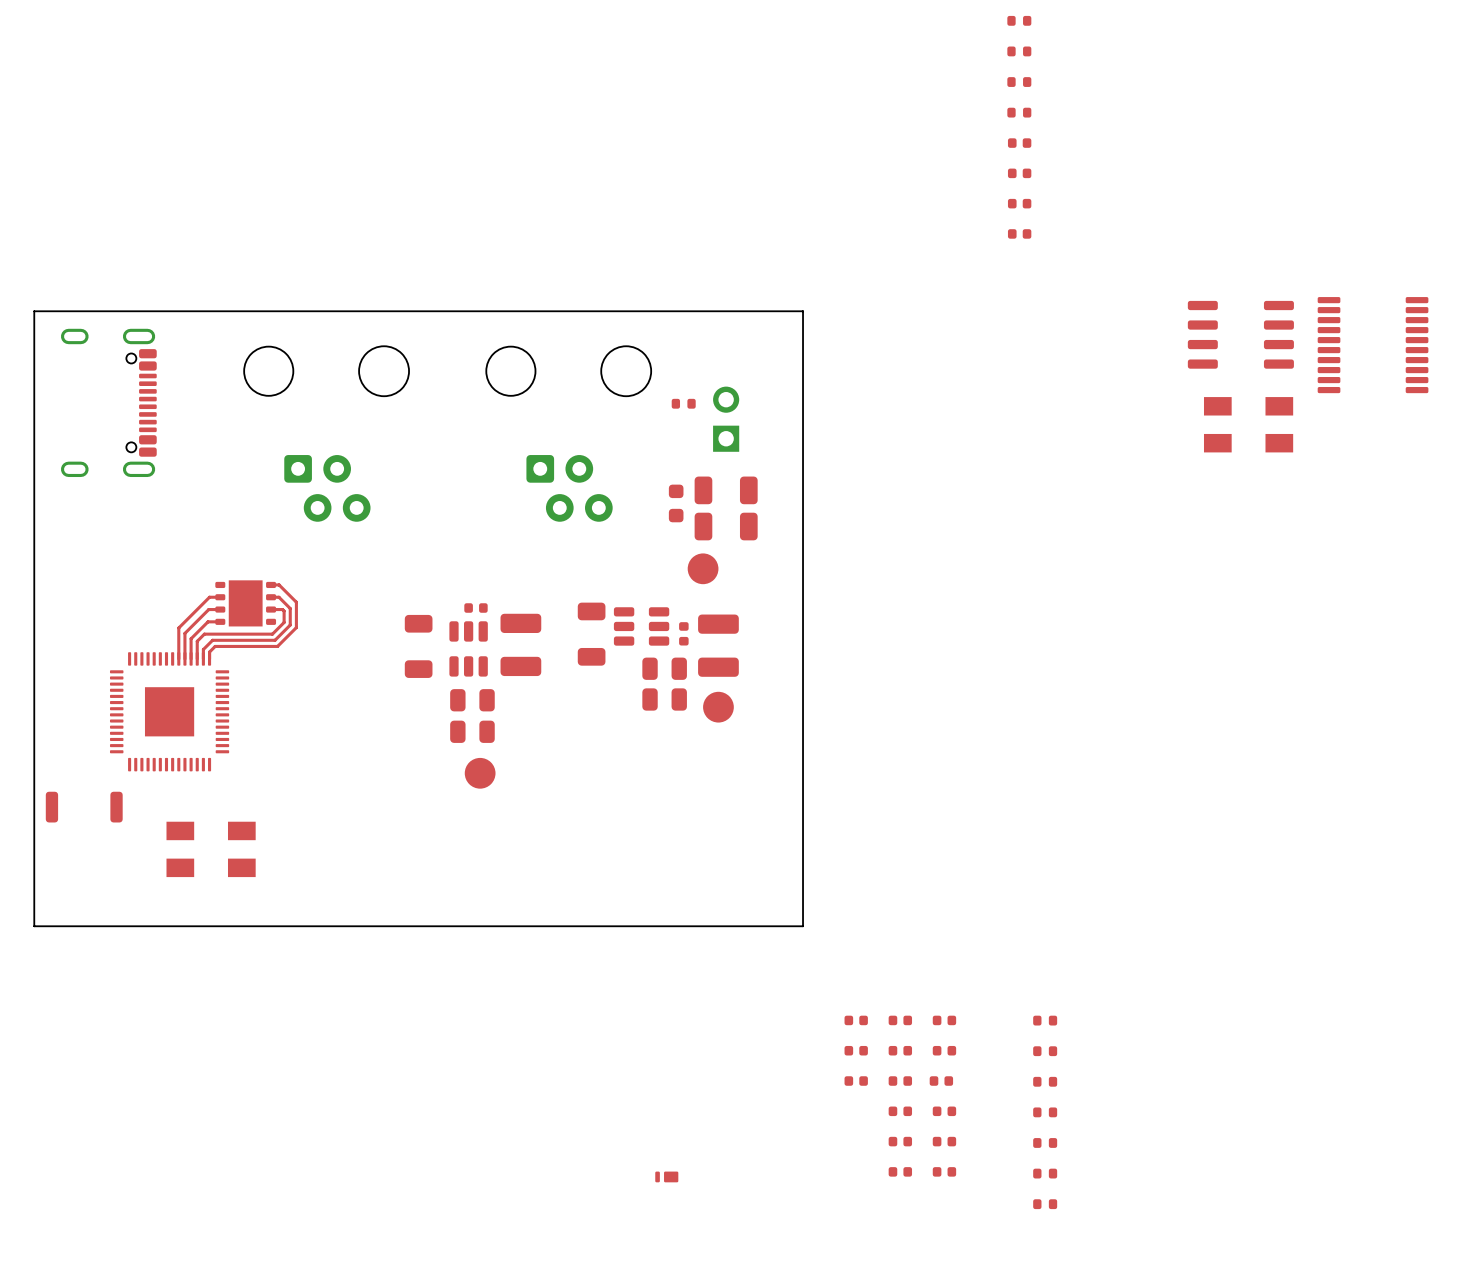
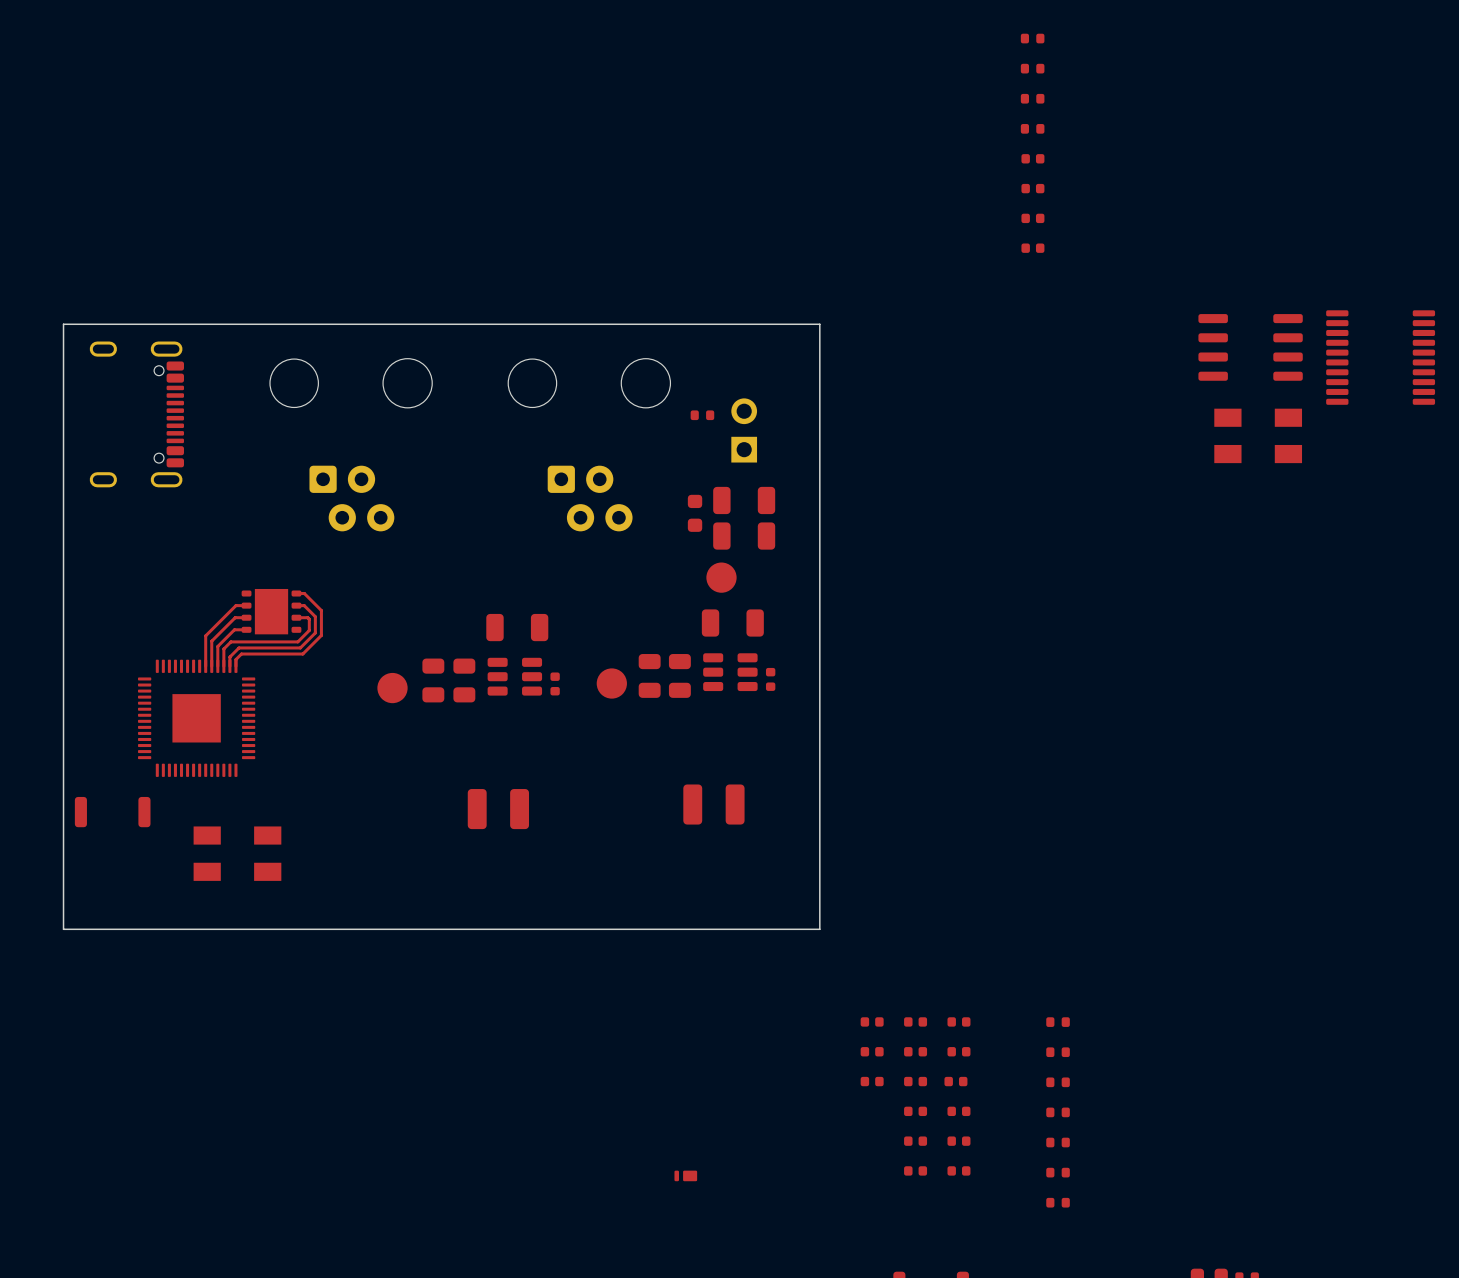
part: (475, 608) -> none
part: none -> (732, 623)
part: none -> (517, 627)
part: (641, 626) -> none
part: (683, 633) -> none
part: (591, 634) -> none
part: (520, 644) -> none
part: (718, 645) -> none
part: (418, 646) -> none
part rotation: 0° (468, 648) -> 90° clockwise (514, 676)
part: none -> (730, 672)
part rotation: 0° (664, 668) -> 90° clockwise (679, 675)
part: none -> (770, 679)
part: none -> (433, 680)
part: none -> (464, 680)
part: none -> (555, 683)
part: none -> (611, 683)
part: none -> (392, 688)
part rotation: 0° (664, 699) -> 90° clockwise (649, 675)
part position: (664, 699) -> (649, 675)
part: (472, 700) -> none
part: (718, 707) -> none
part: (472, 731) -> none
part: (480, 773) -> none
part: none -> (713, 804)
part: none -> (498, 809)

